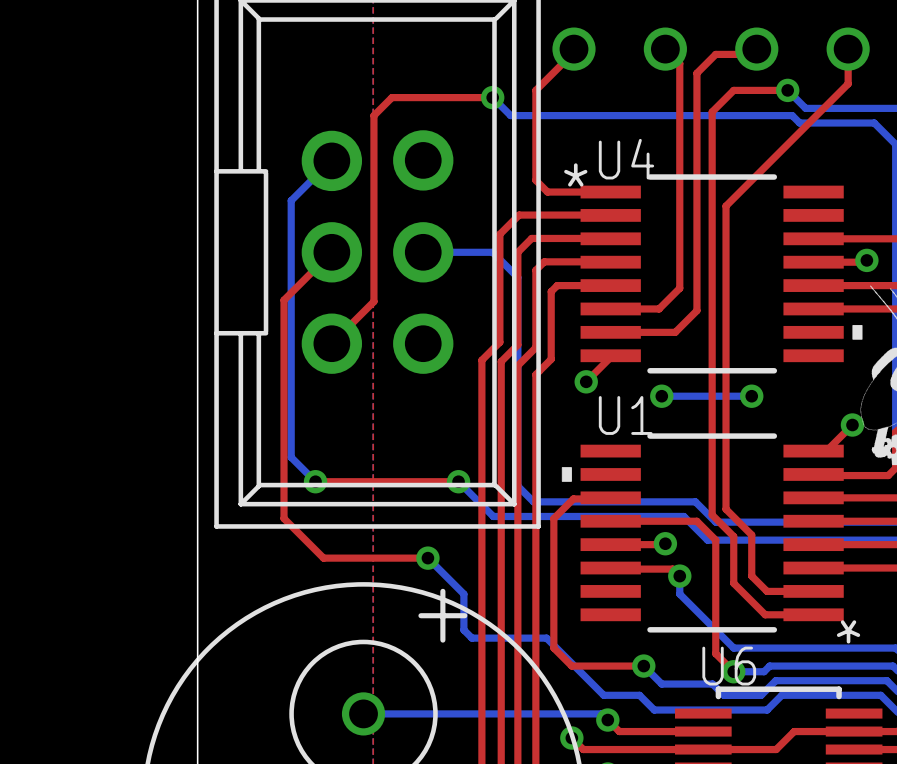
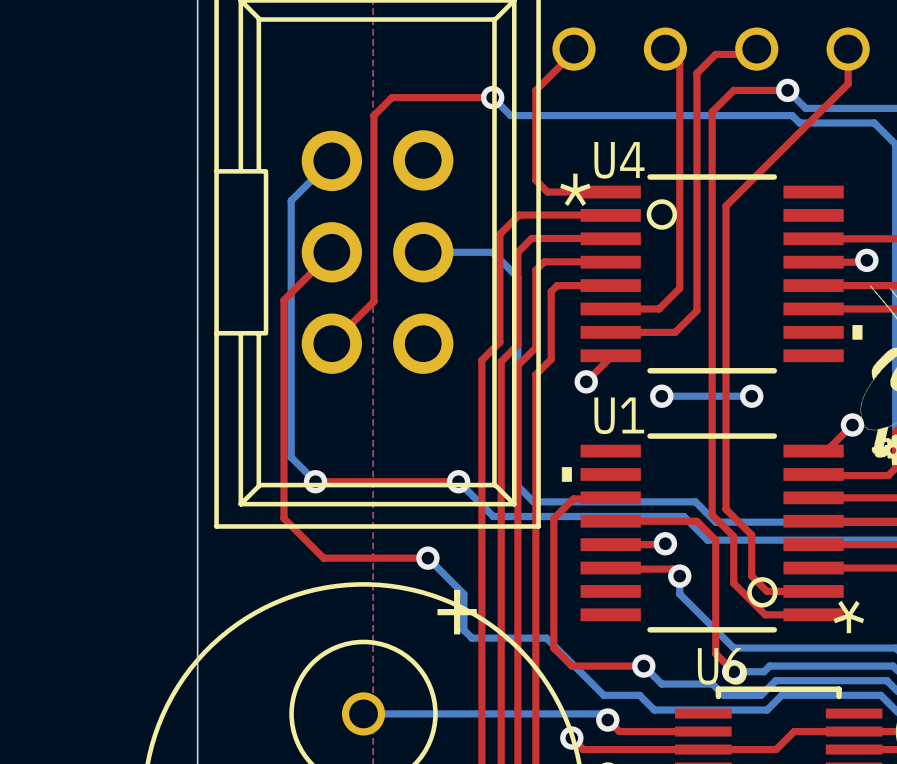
U4 footprint: [580, 174, 863, 374] -> [580, 174, 863, 374]
U1 footprint: [561, 433, 844, 633] -> [561, 433, 844, 633]

